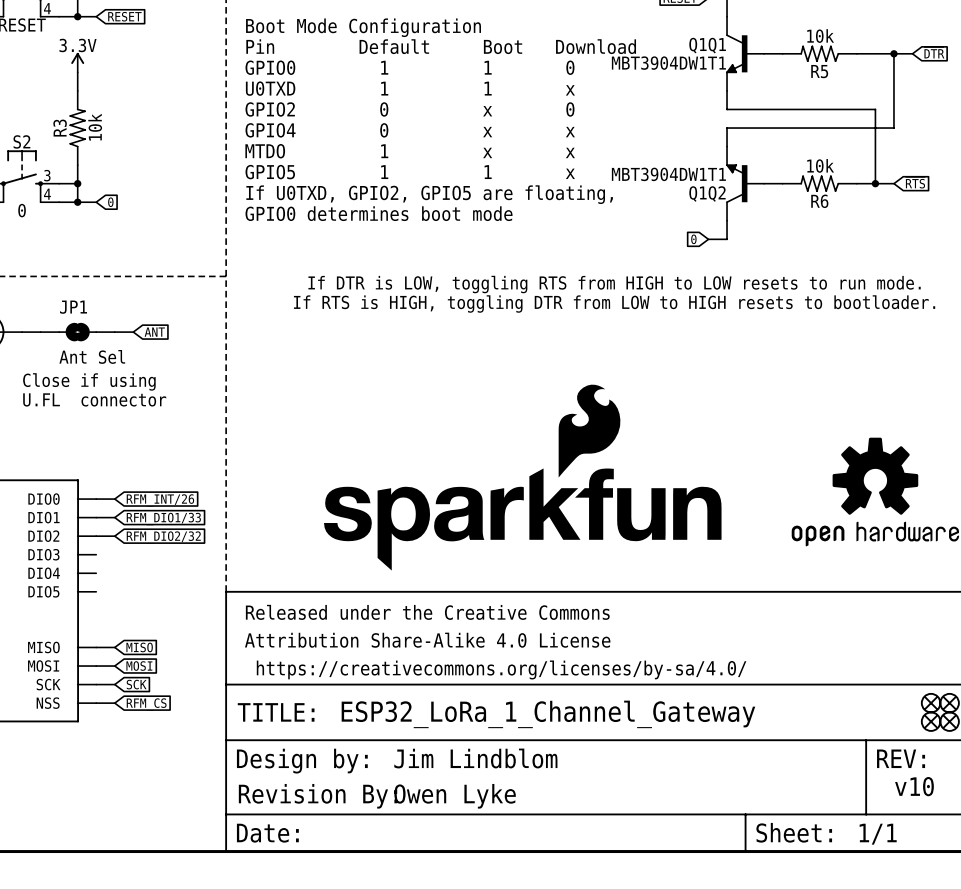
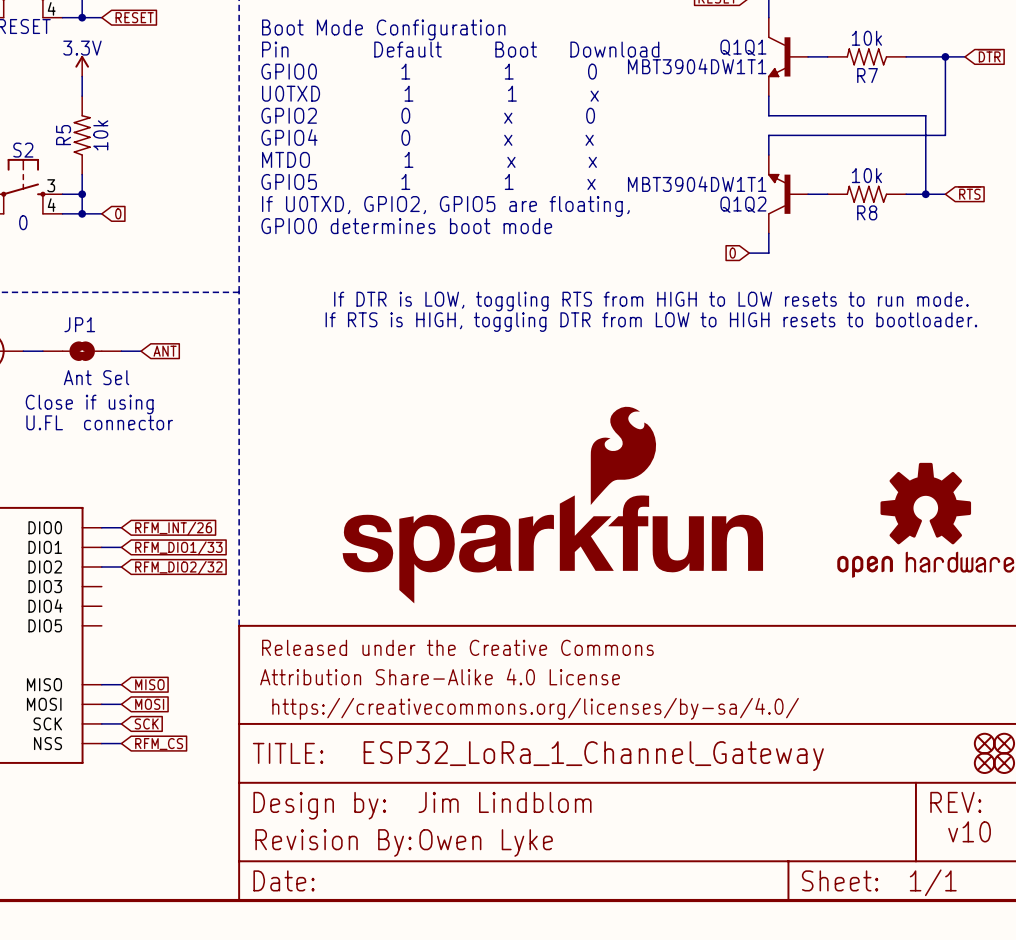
R5 name: R5 (819, 71) -> R7 (867, 75)
R3 name: R3 (60, 128) -> R5 (63, 135)
R6 name: R6 (819, 201) -> R8 (867, 212)

